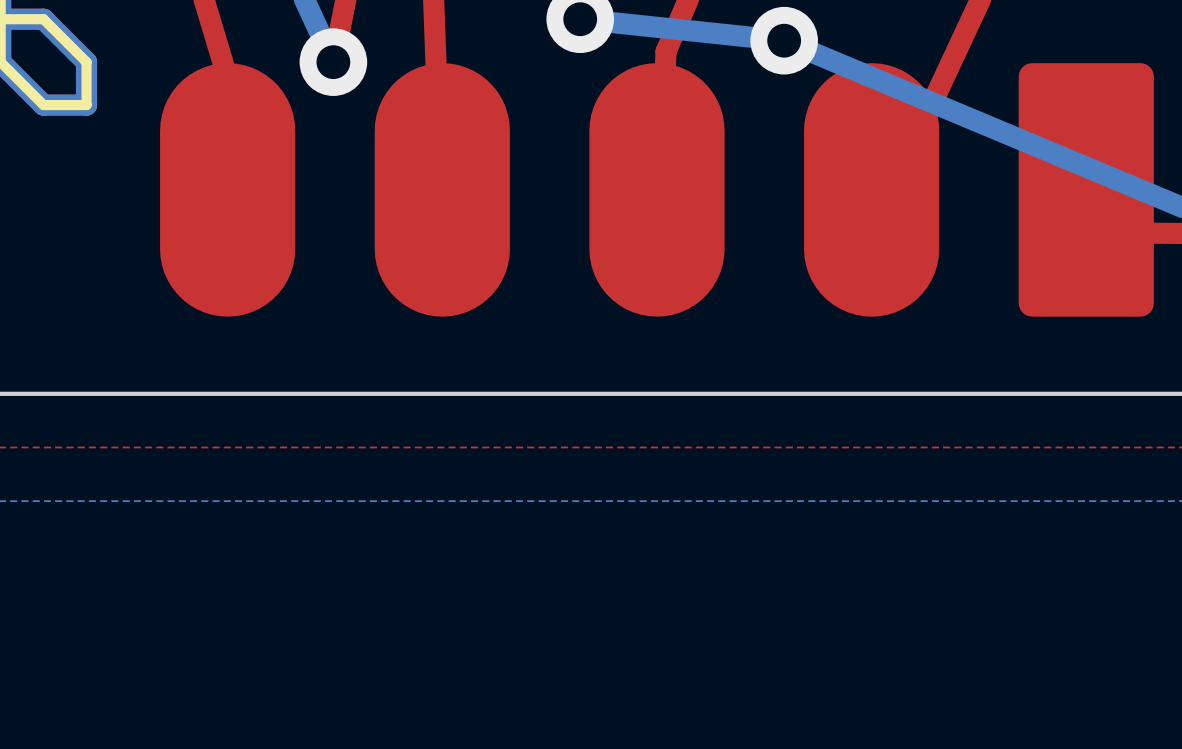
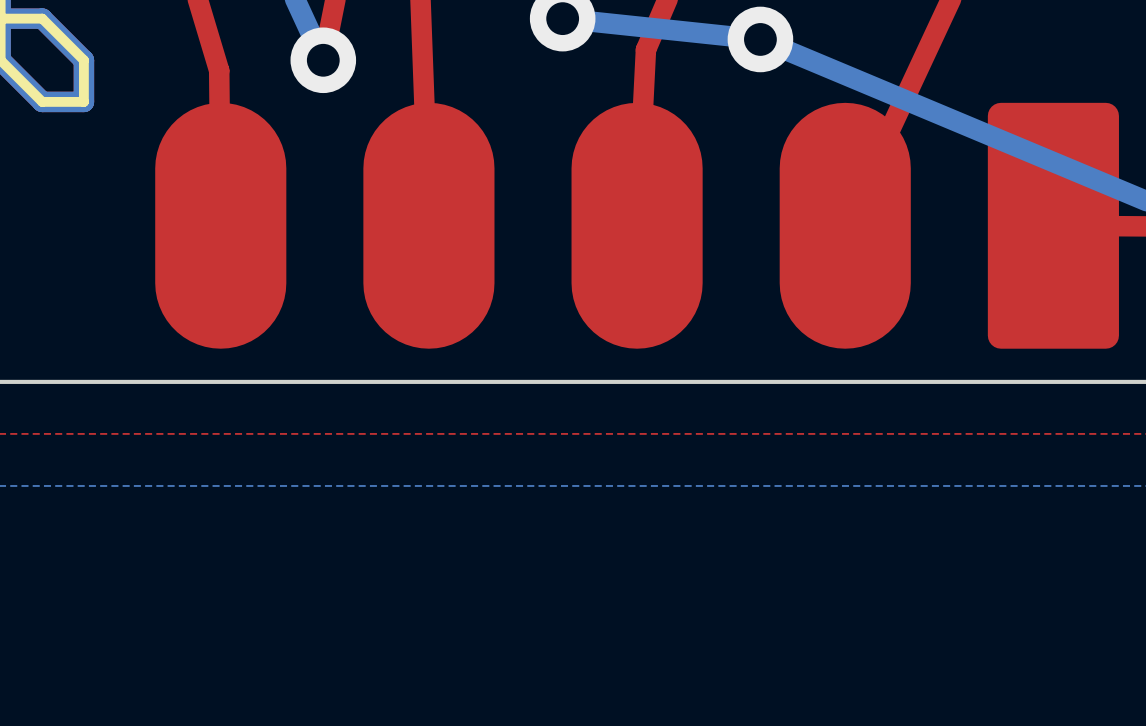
part position: (656, 189) -> (637, 225)

